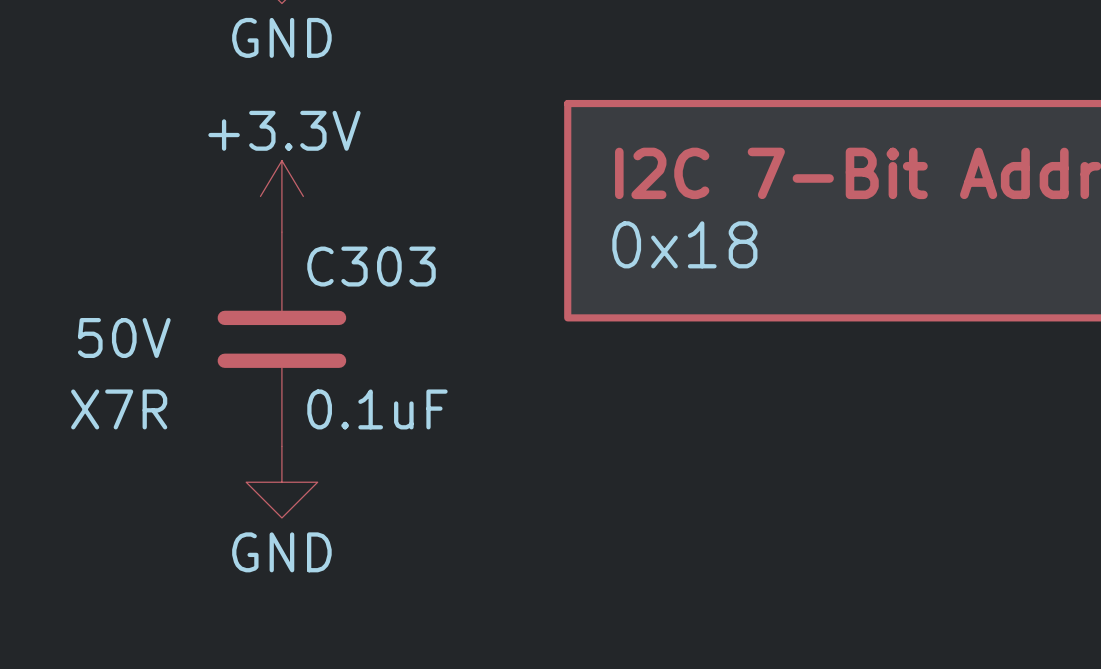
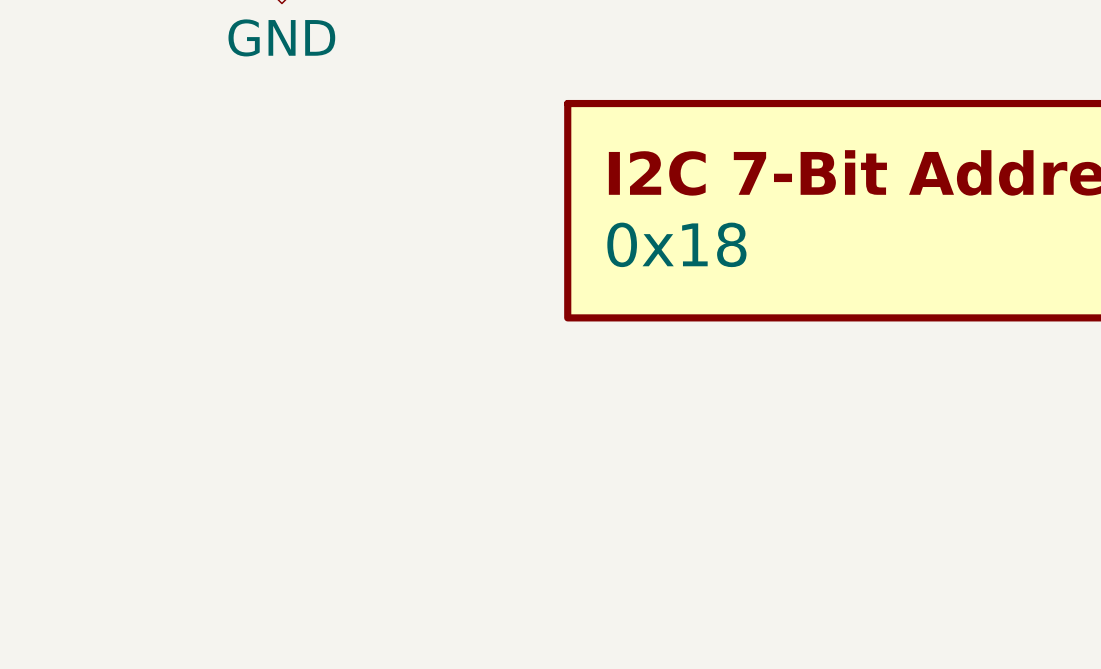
power symbol: +3.3V (281, 196) -> none
C303: 0.1uF (281, 339) -> none
power symbol: GND (281, 482) -> none

